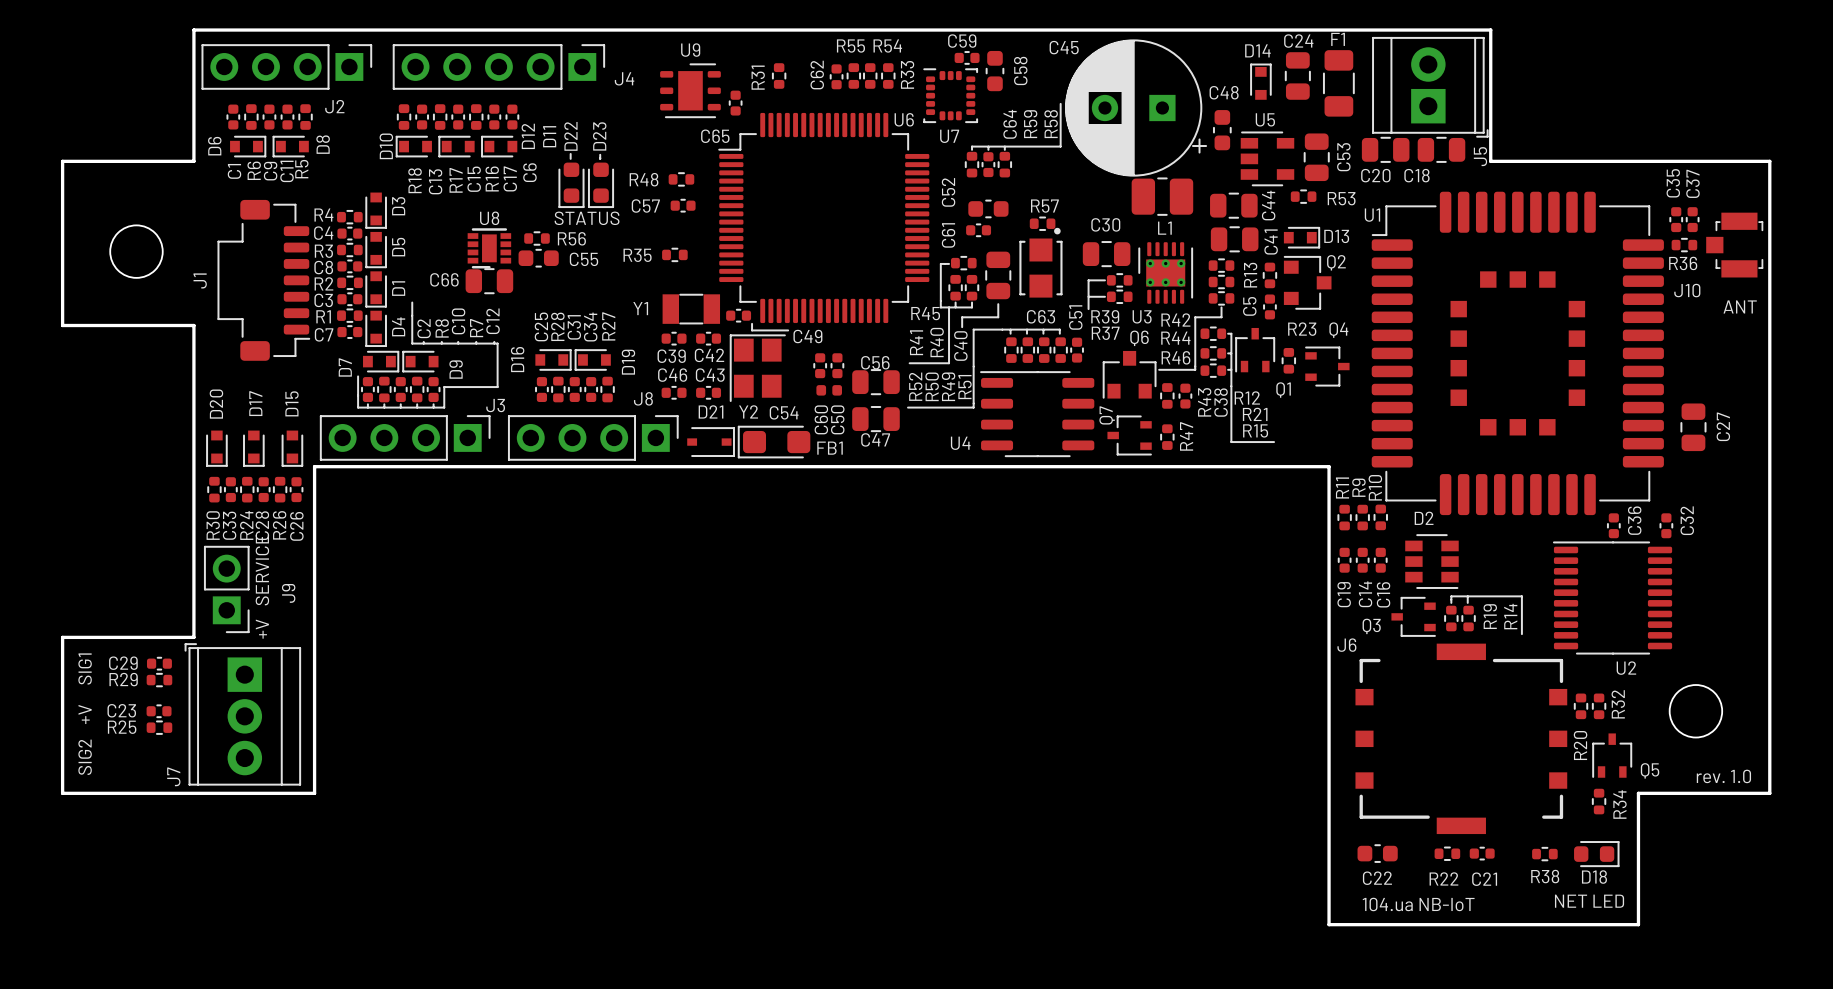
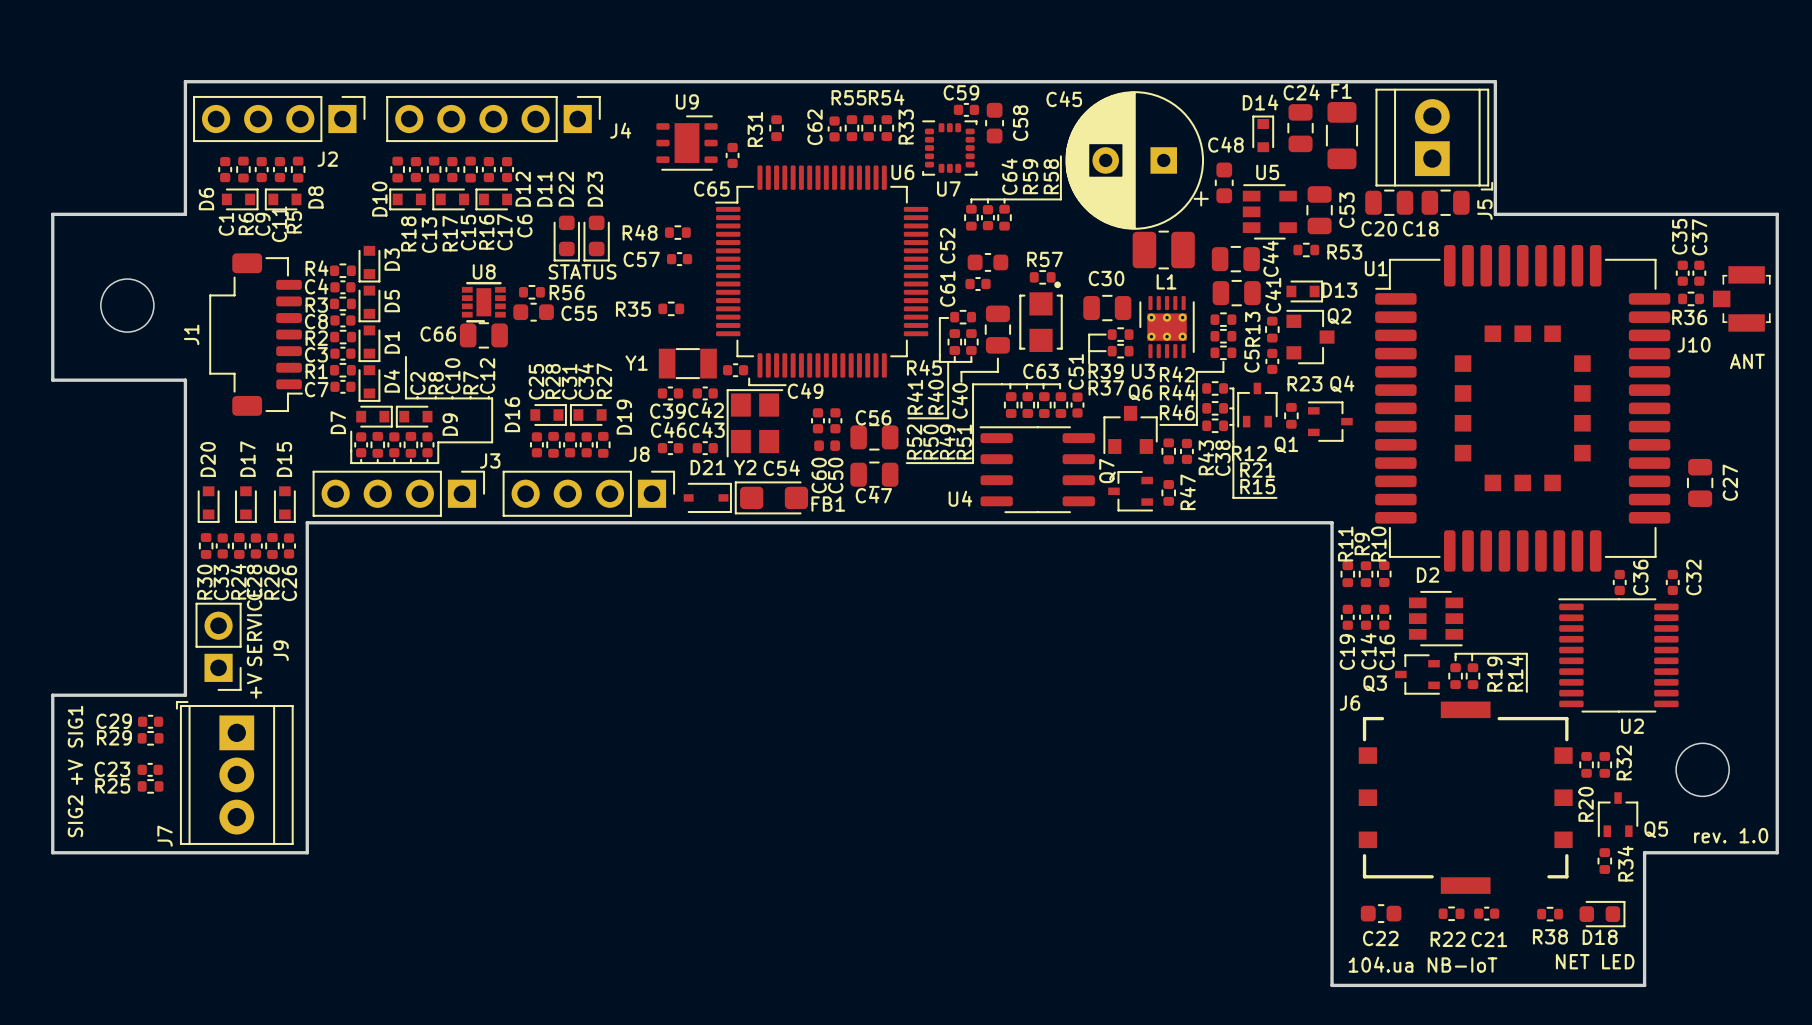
line: (570, 153) (570, 158) -> none
line: (600, 154) (600, 158) -> none

